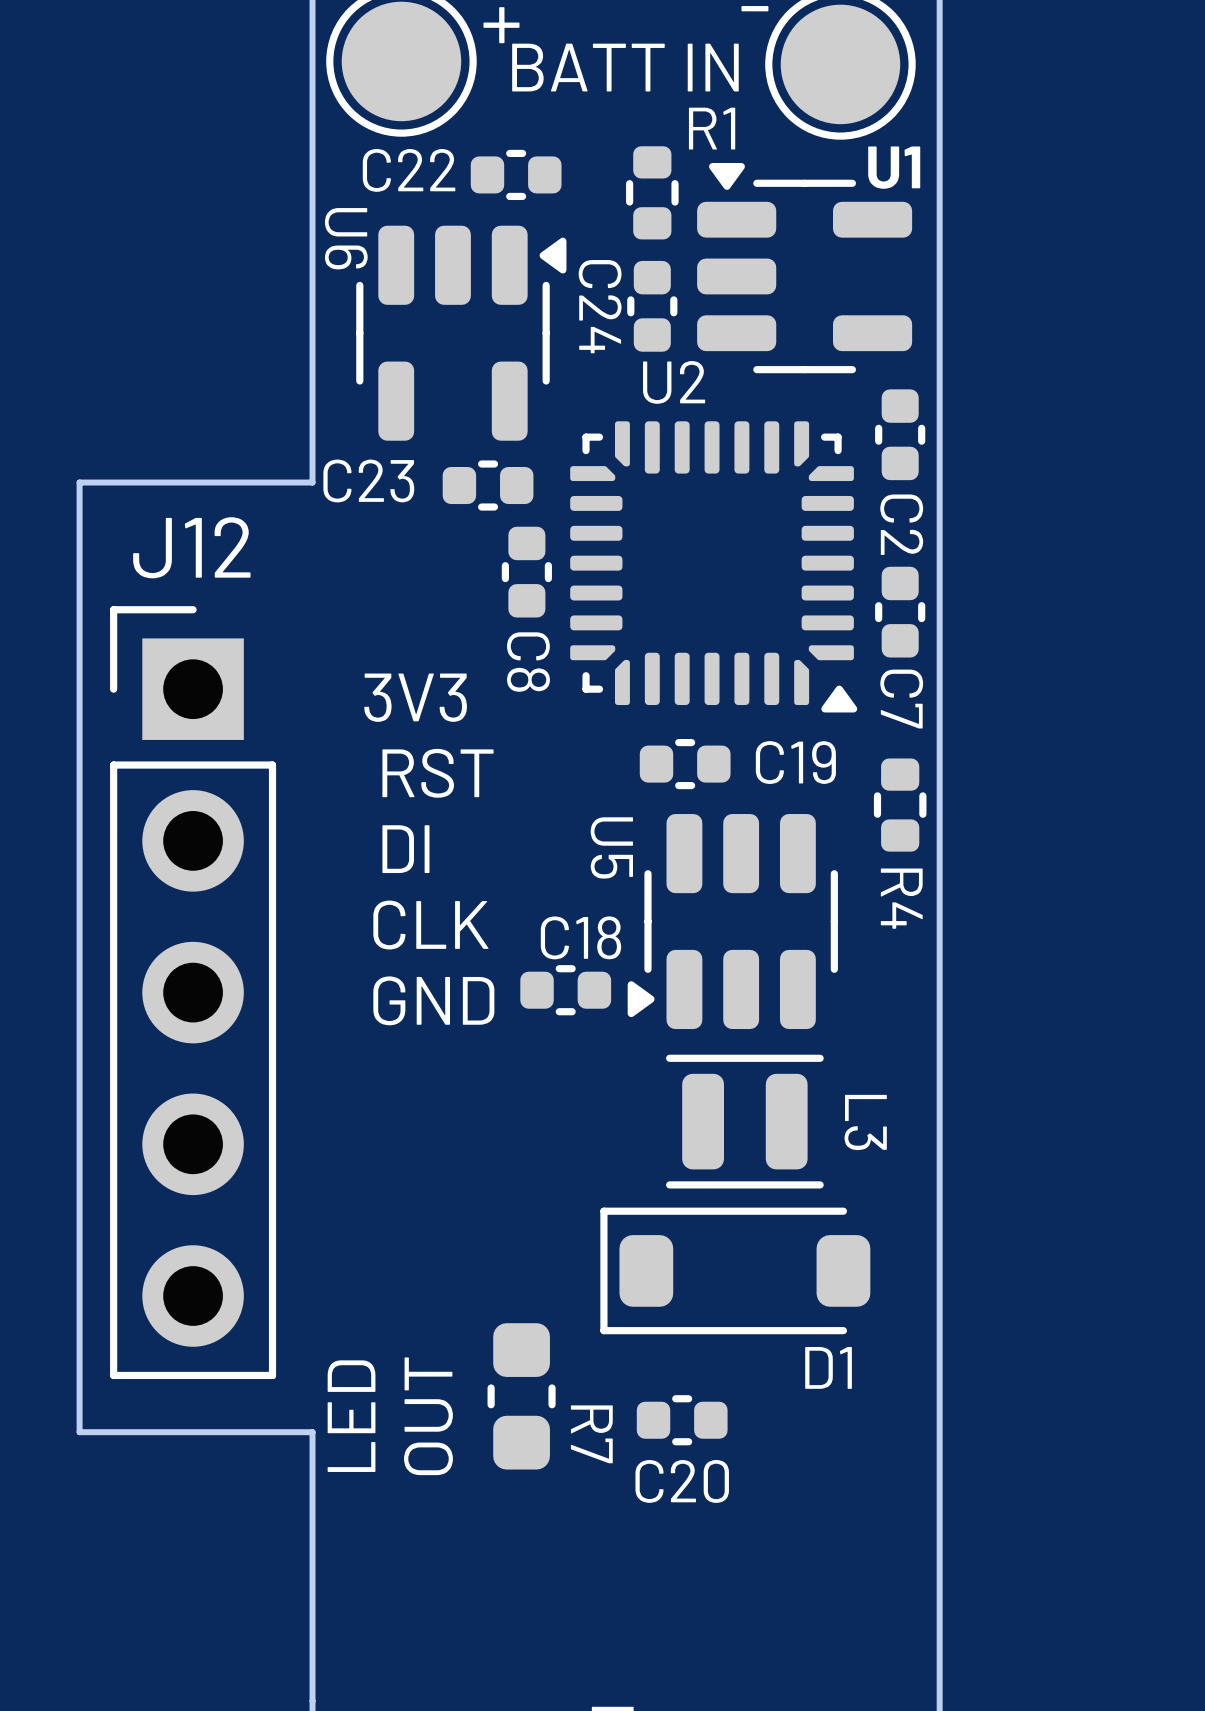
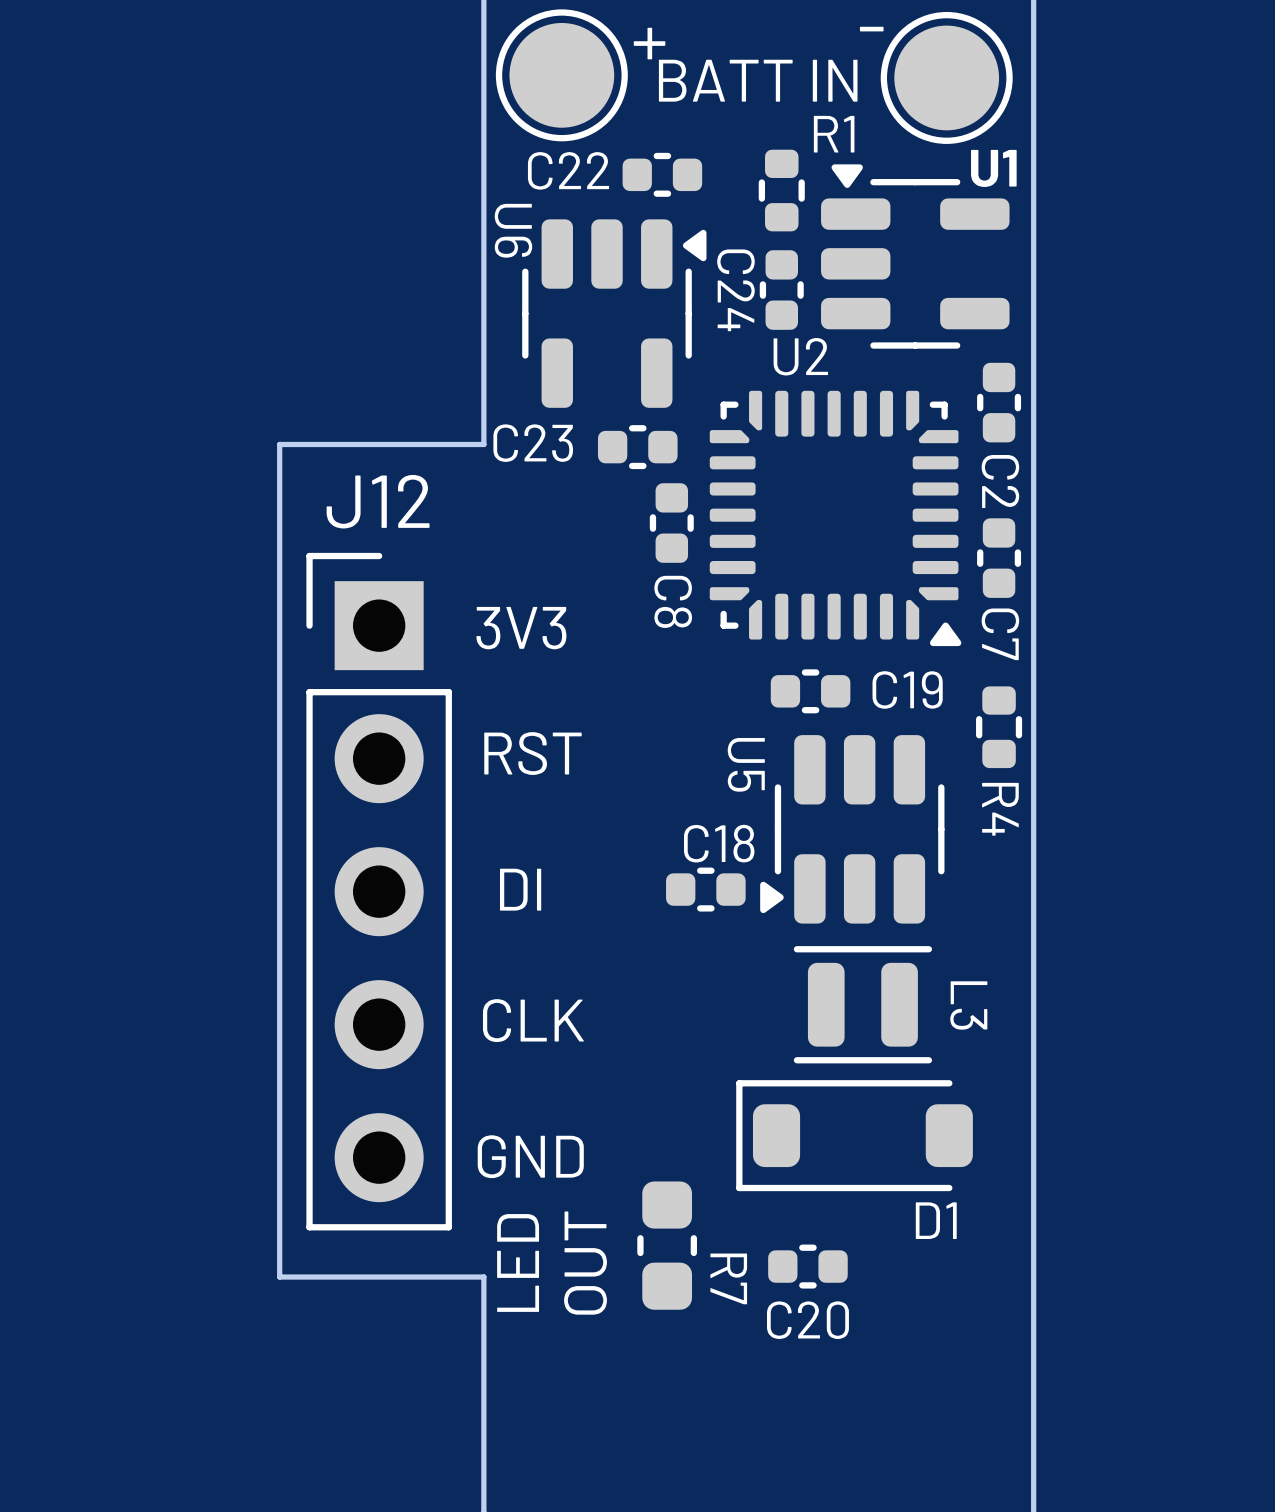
text position: 3V3 (415, 697) -> 3V3 (521, 628)
text position: RST (438, 773) -> RST (532, 753)
text position: DI (405, 849) -> DI (520, 889)
text position: CLK (430, 925) -> CLK (533, 1020)
text position: GND (433, 1000) -> GND (530, 1156)

